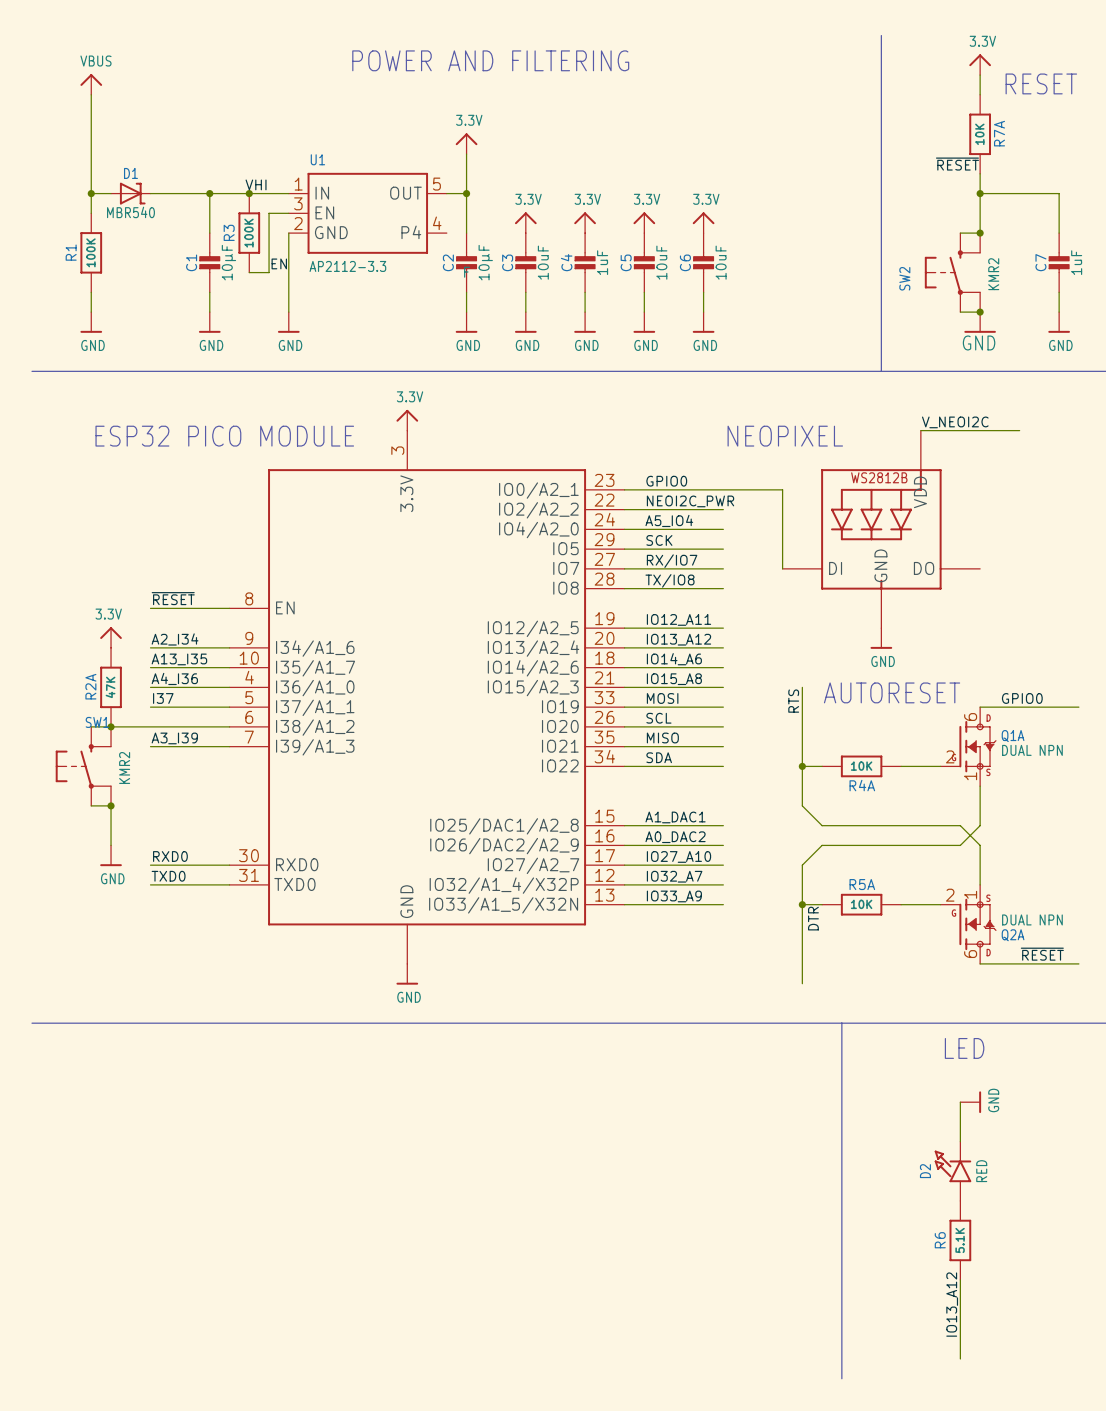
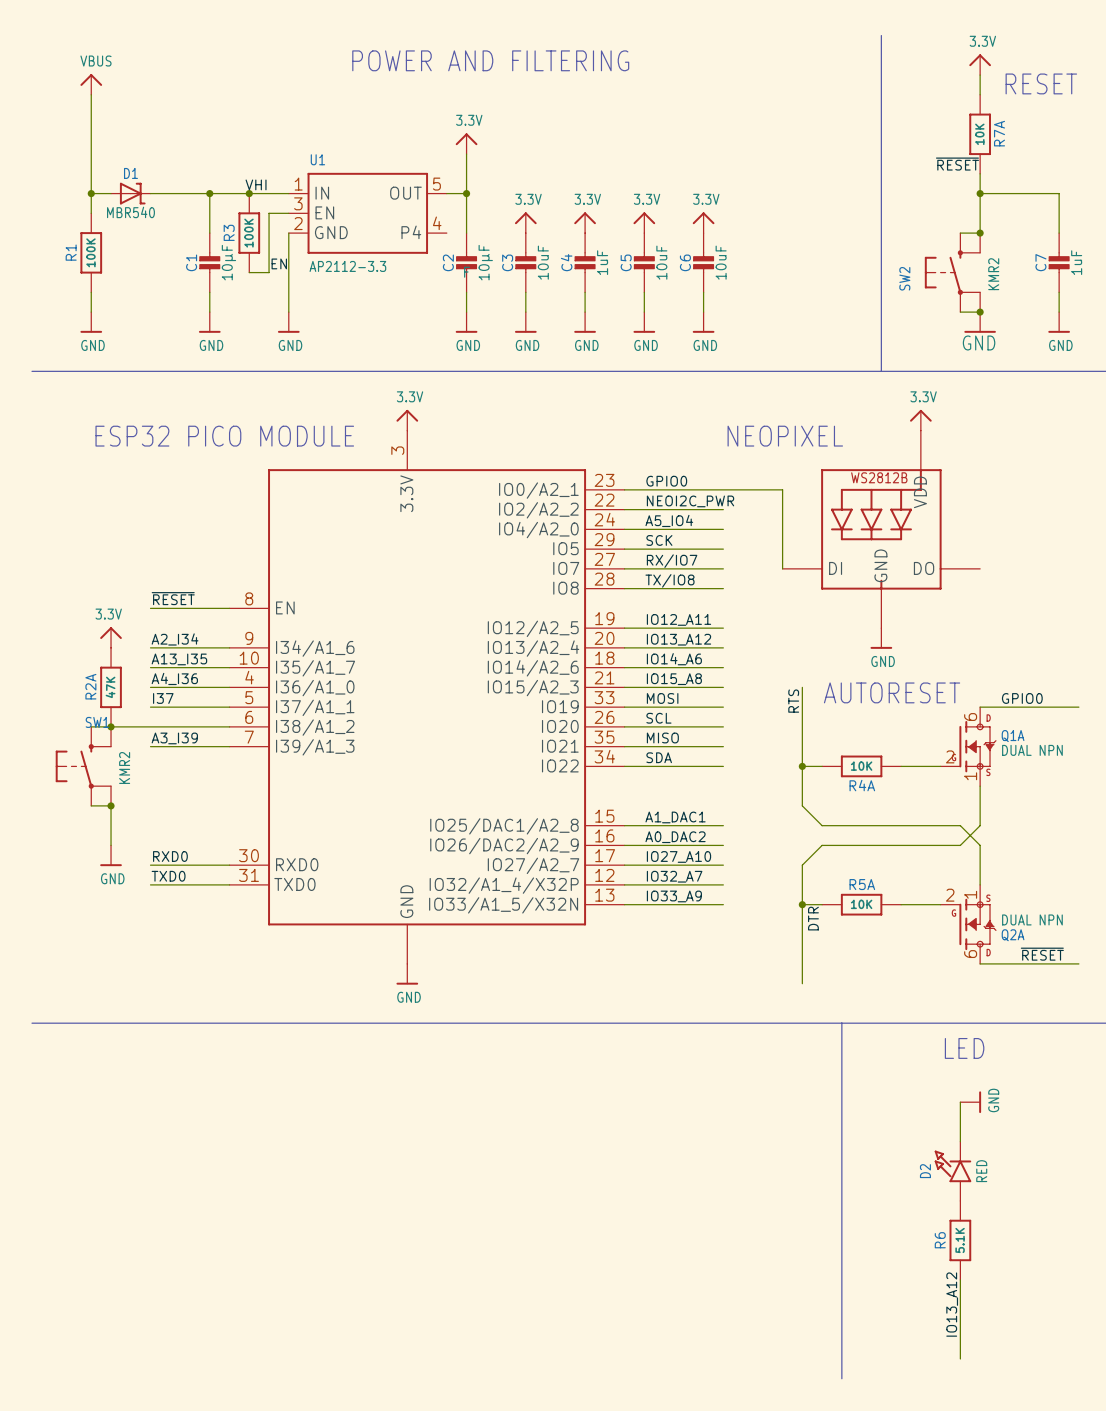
power symbol: none -> 3.3V (920, 420)
label: V_NEOI2C (955, 422) -> none
wire: (920, 430) (1019, 430) -> none

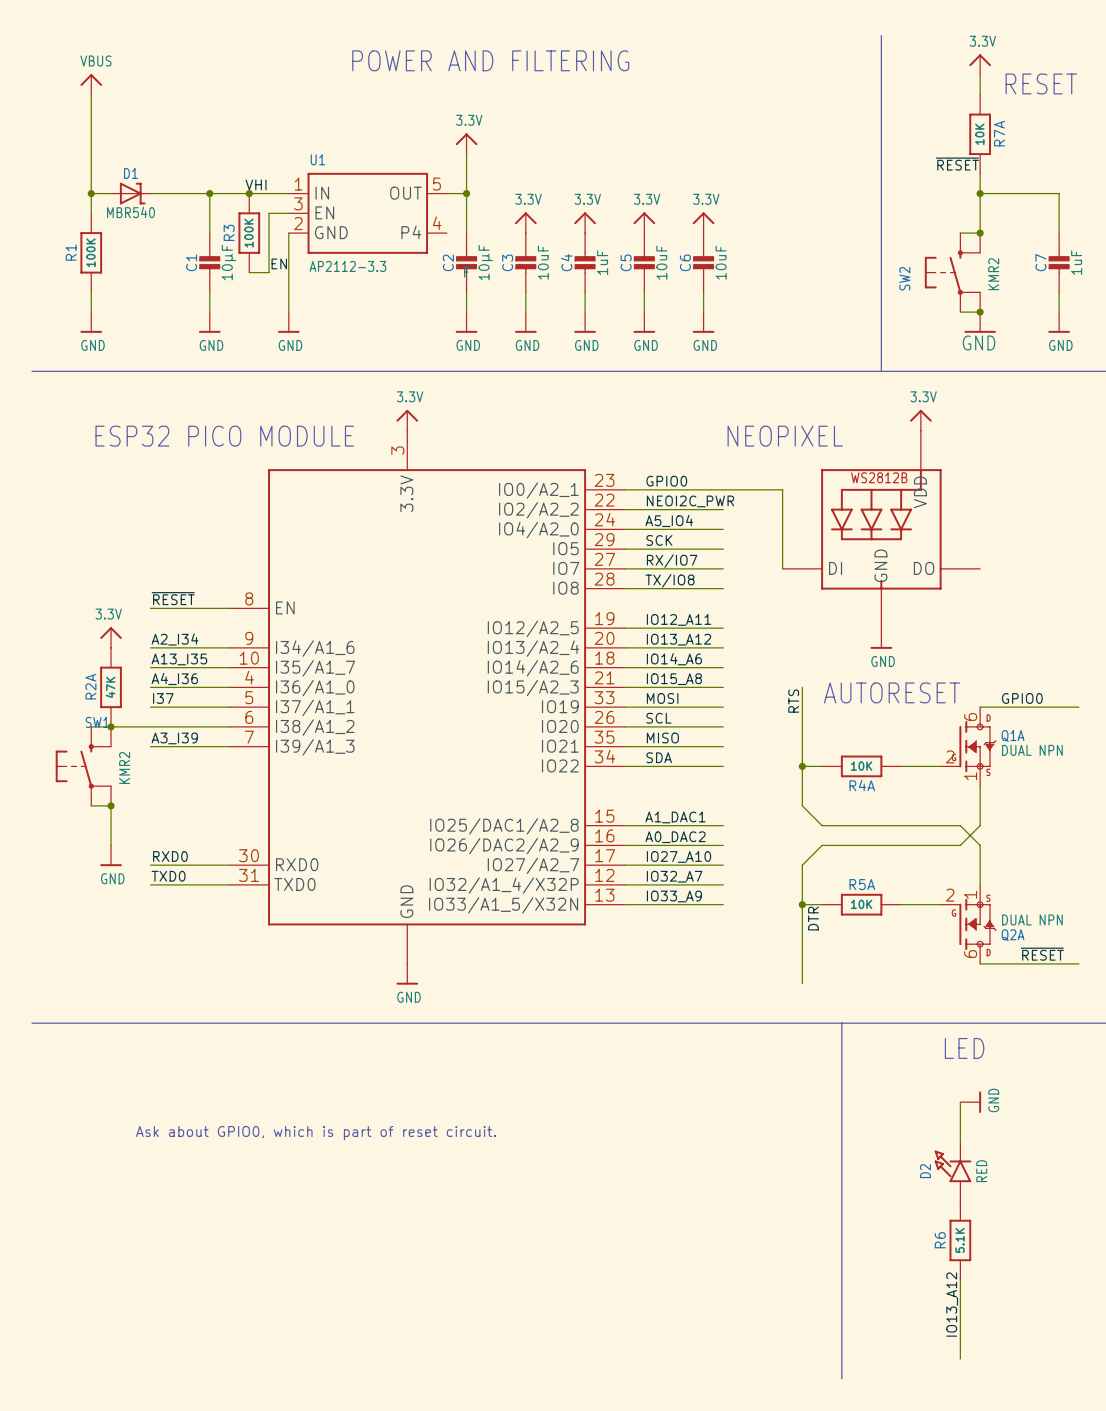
text: none -> Ask about GPIO0, which is part of reset circuit. (315, 1133)

